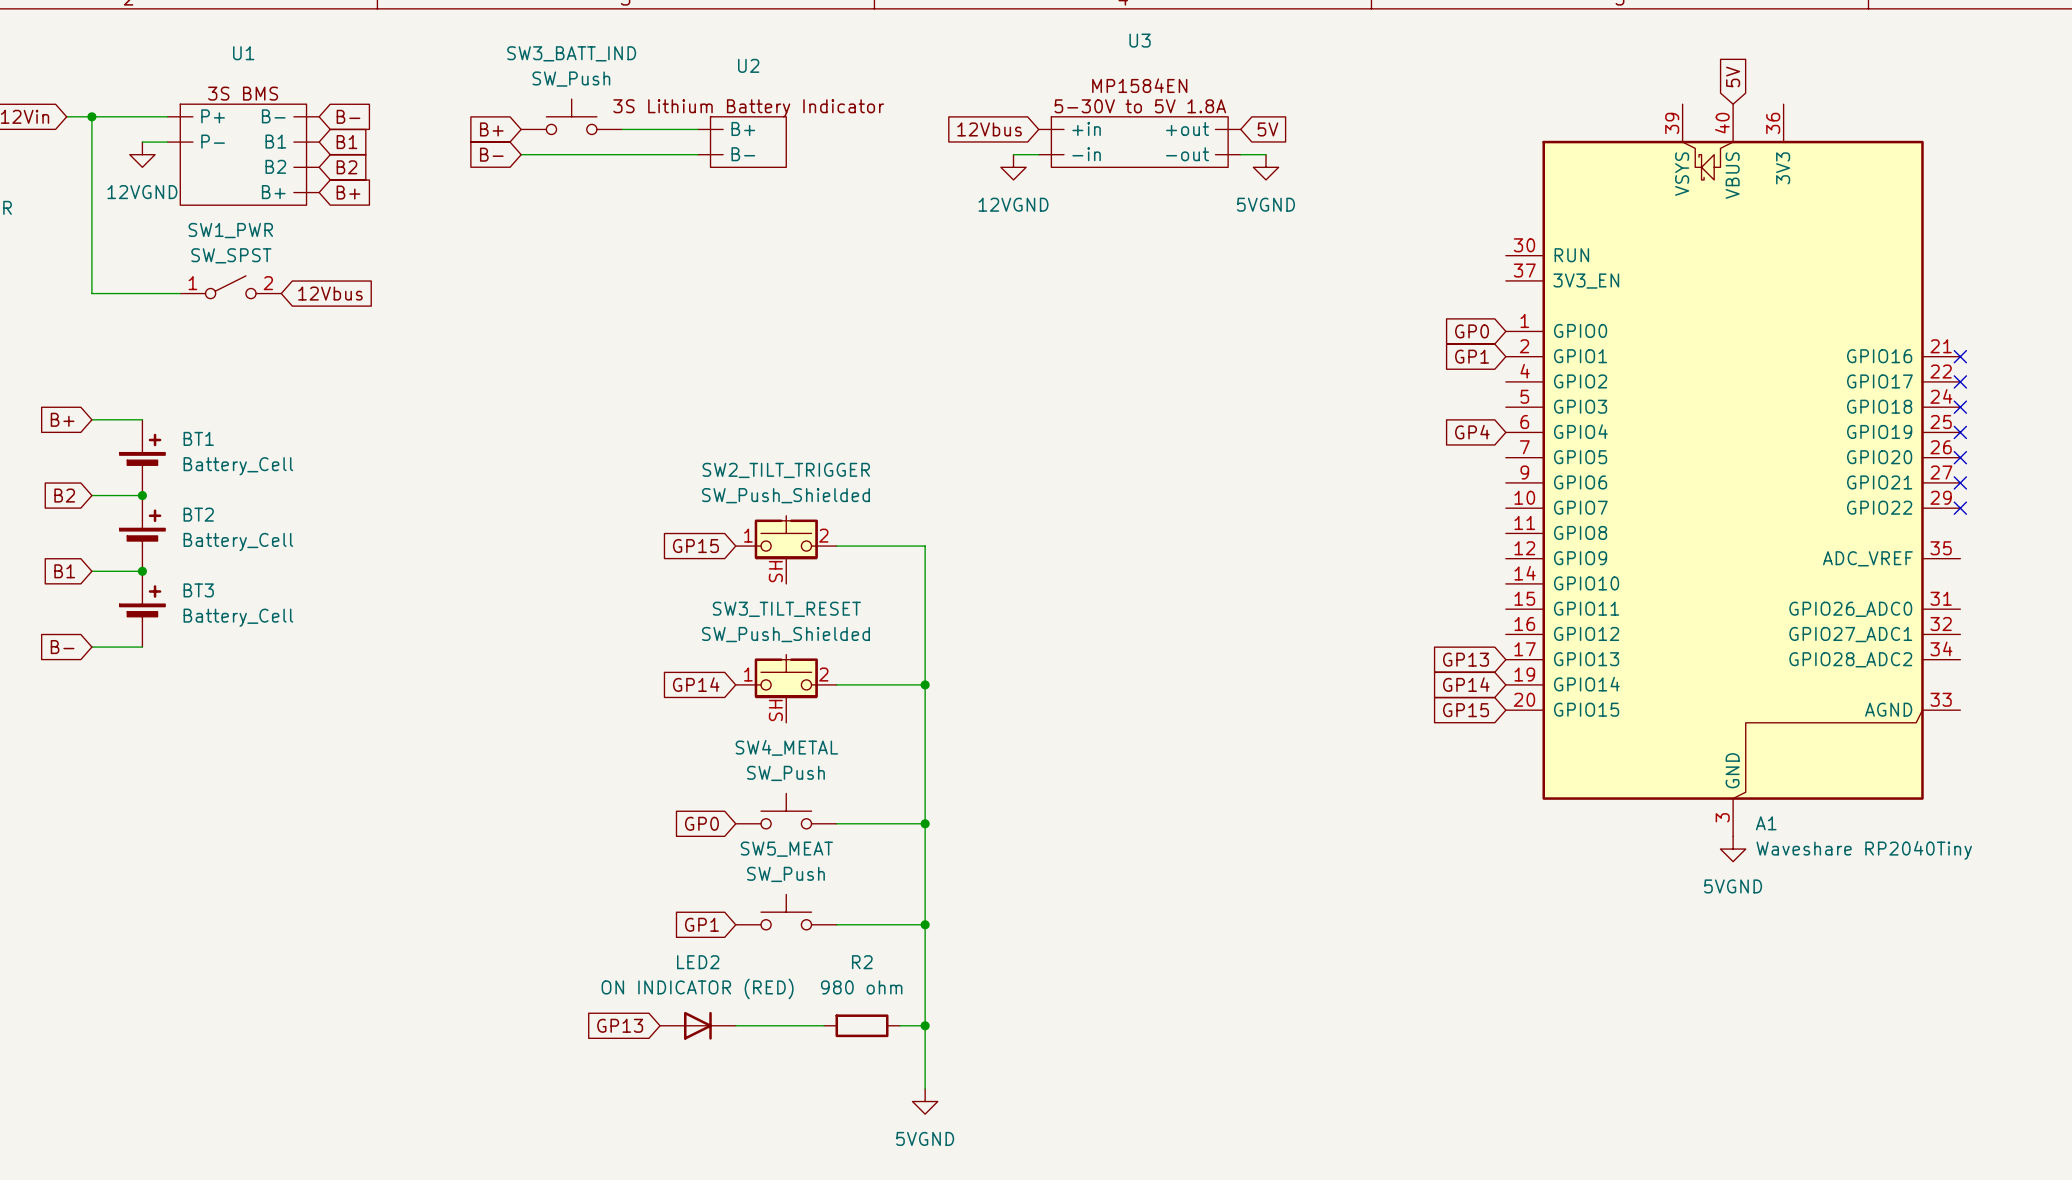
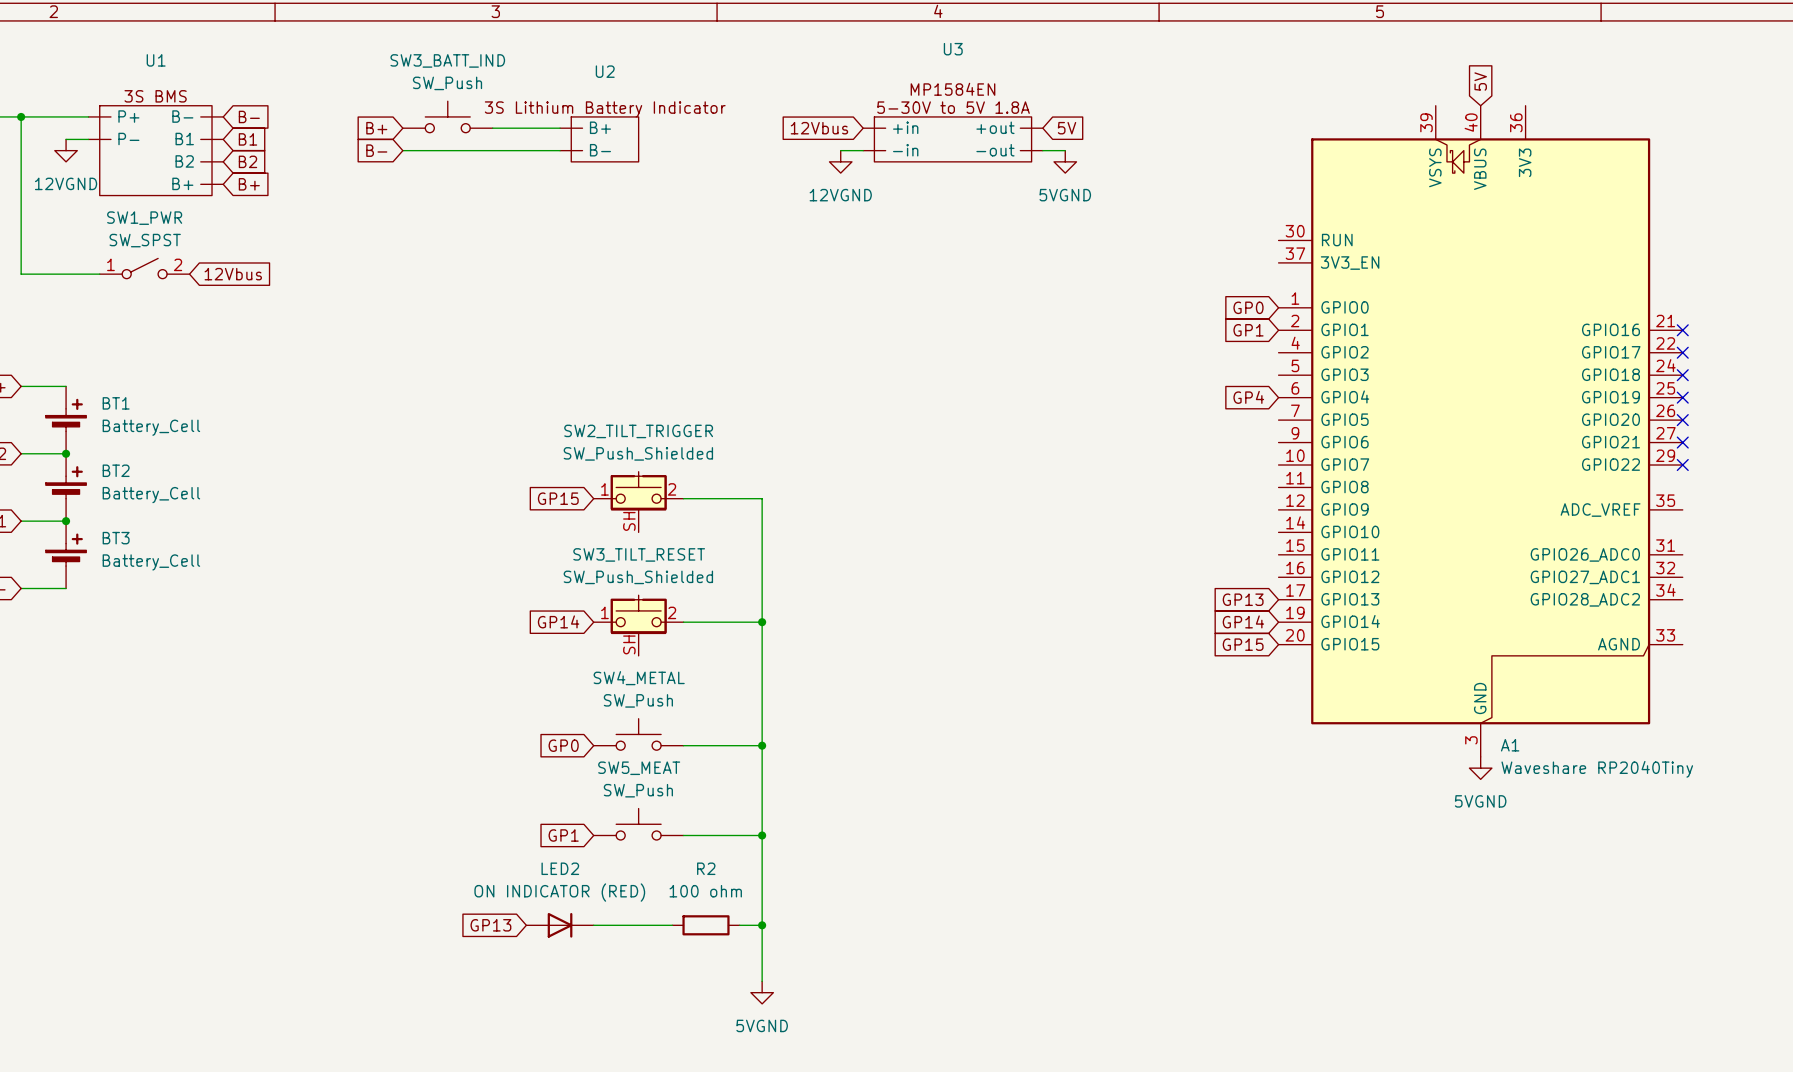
R2 value: 980 ohm (861, 987) -> 100 ohm (705, 891)

